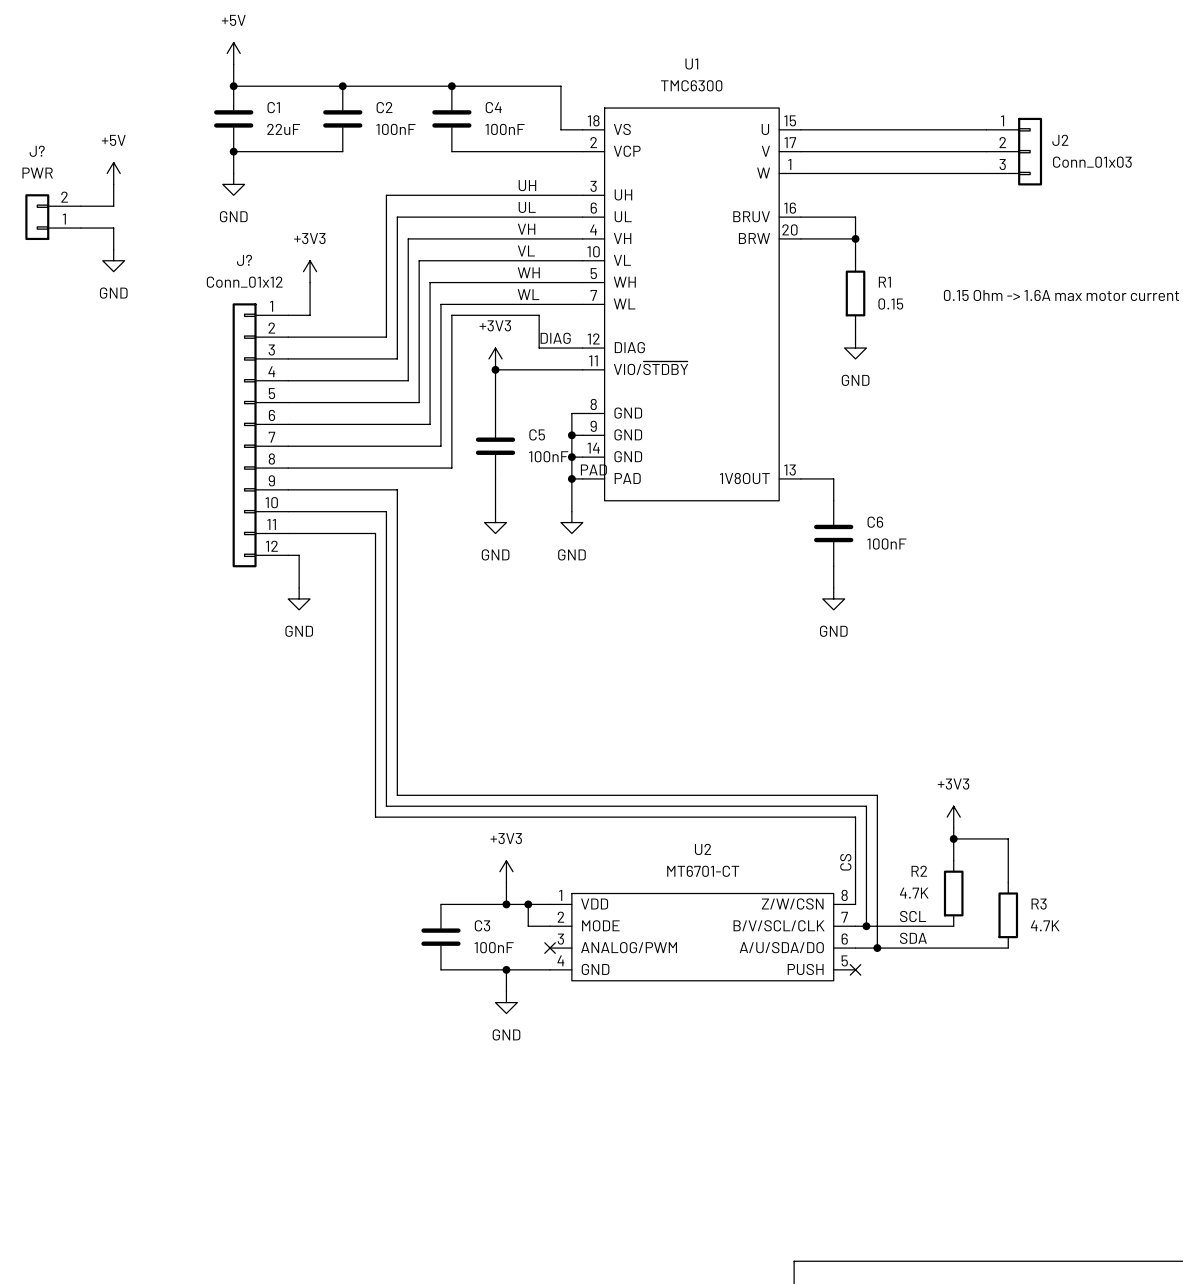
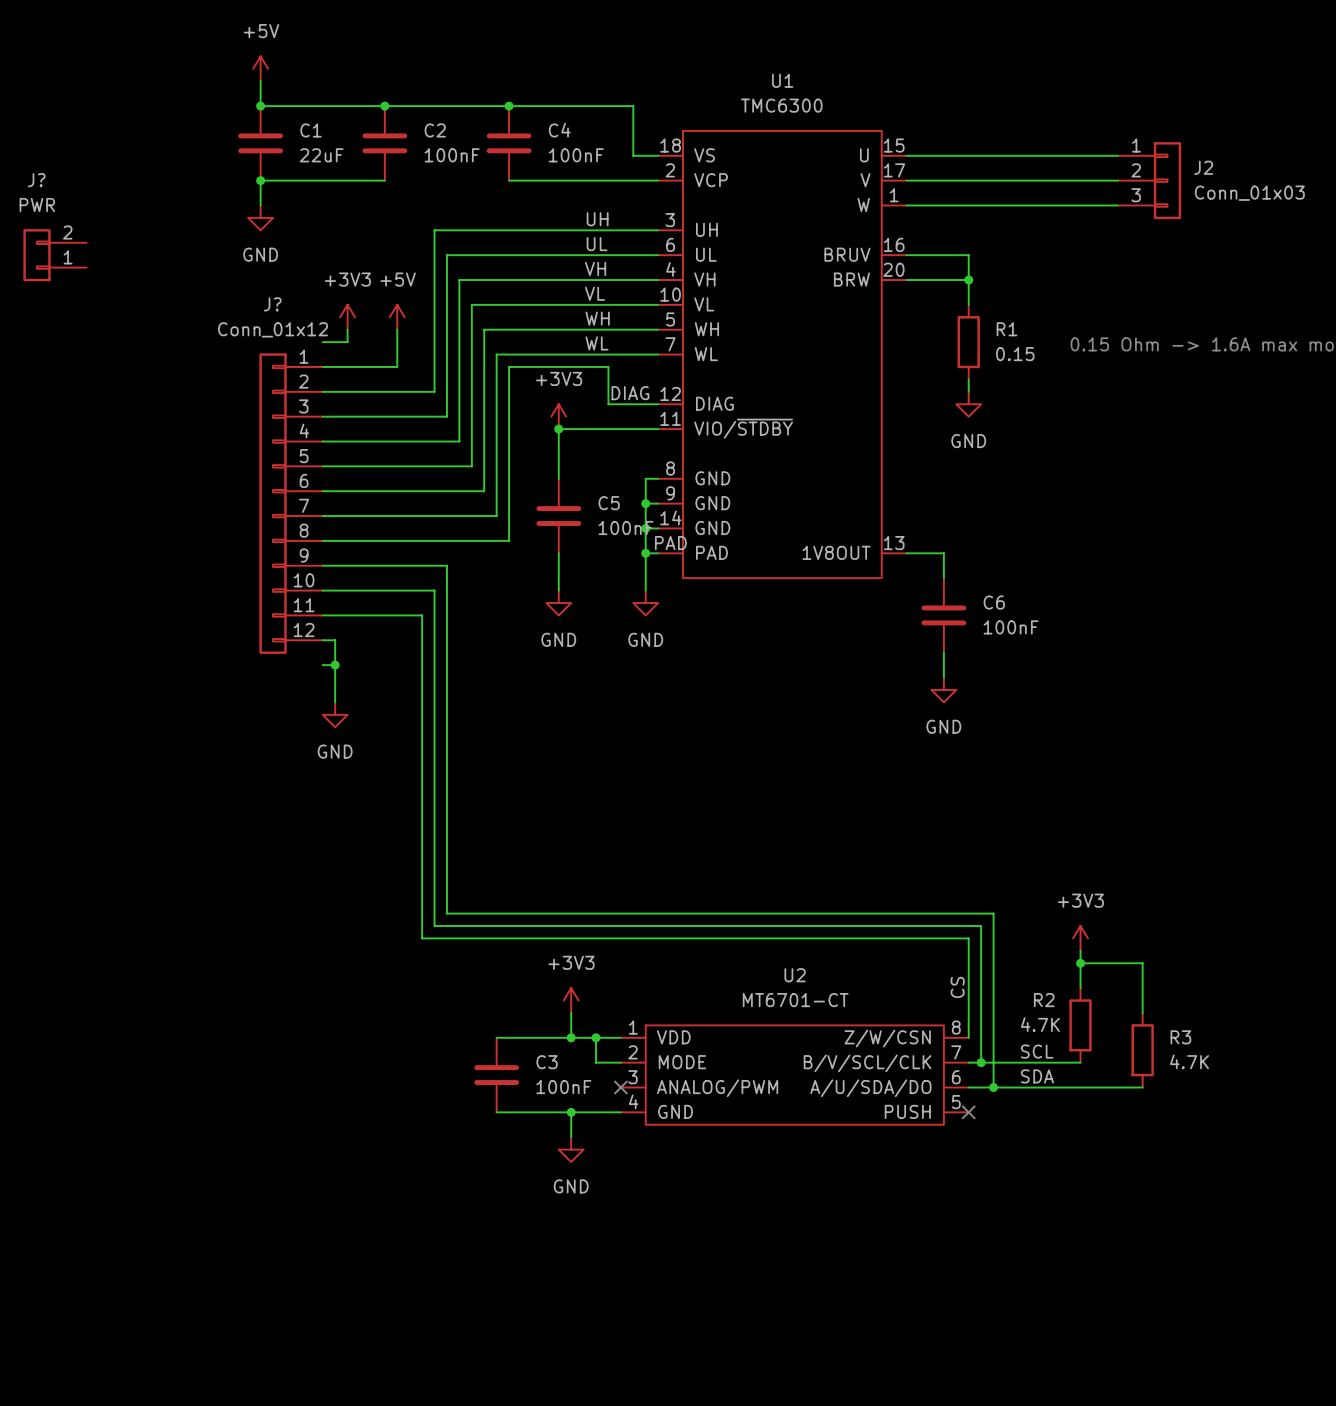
power symbol: +5V (113, 173) -> none
wire: (113, 184) (113, 206) (80, 206) -> none
wire: (80, 228) (113, 228) (113, 249) -> none
power symbol: GND (113, 260) -> none
power symbol: none -> +5V (397, 317)
wire: none -> (397, 329) (397, 366) (347, 366)
wire: (310, 293) (310, 315) -> (347, 342) (322, 342)
wire: none -> (322, 665) (335, 665)
junction: none -> (335, 665)
power symbol position: GND (299, 598) -> GND (335, 714)

